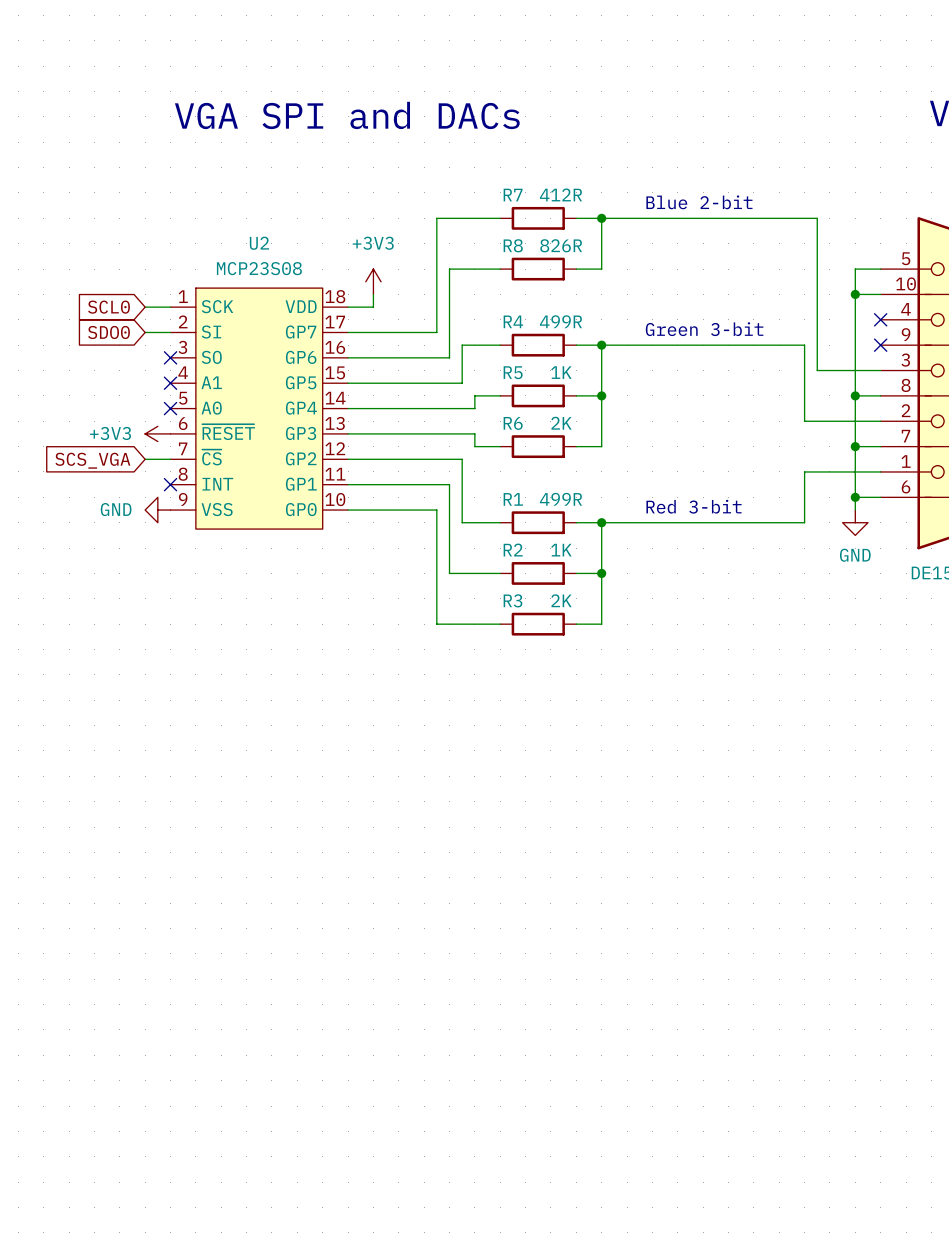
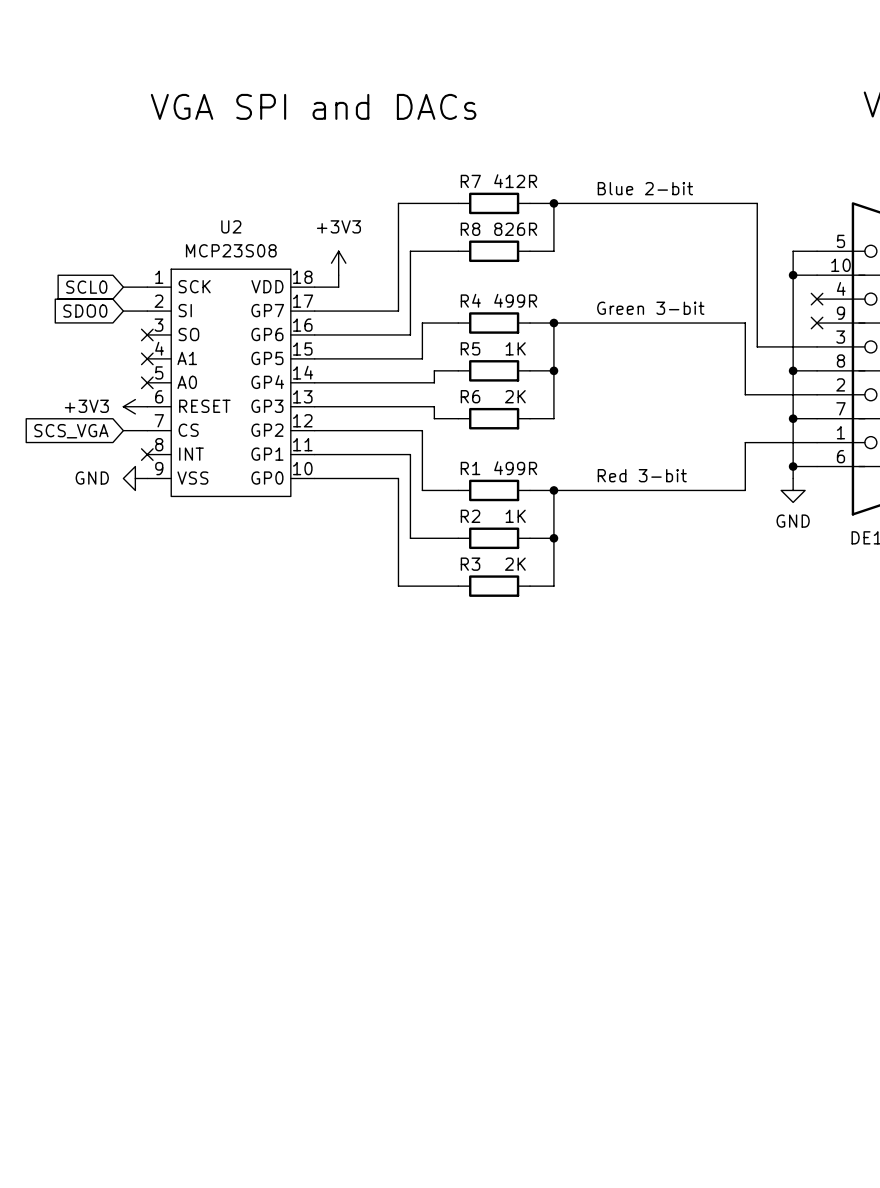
U2 pin name: ~{RESET} (228, 432) -> RESET (204, 406)
U2 pin name: ~{CS} (211, 457) -> CS (188, 430)

